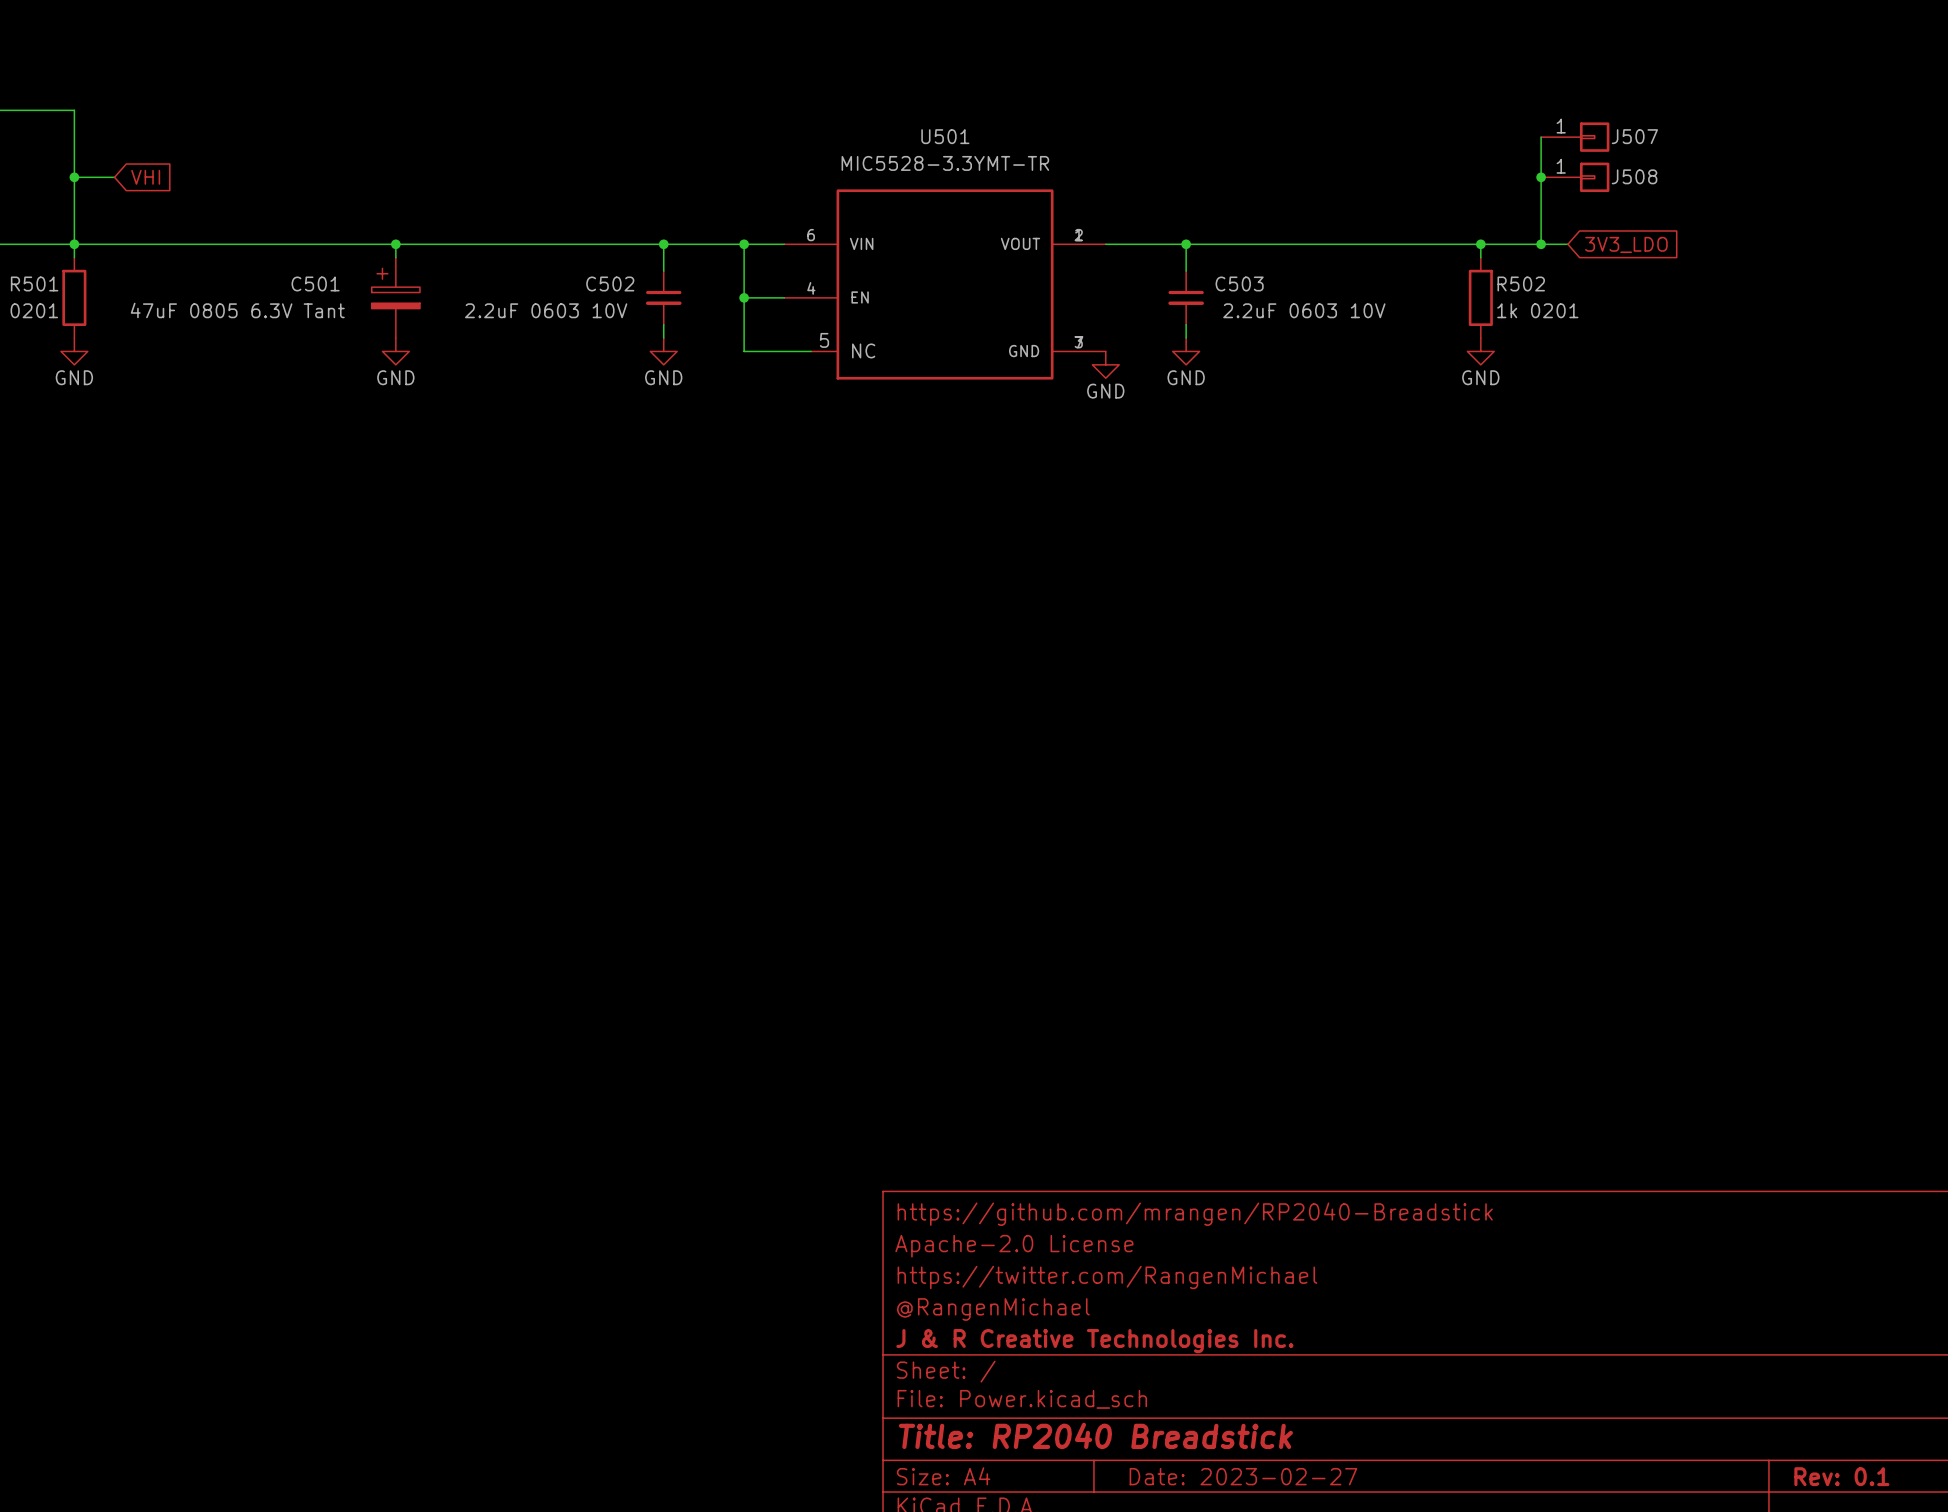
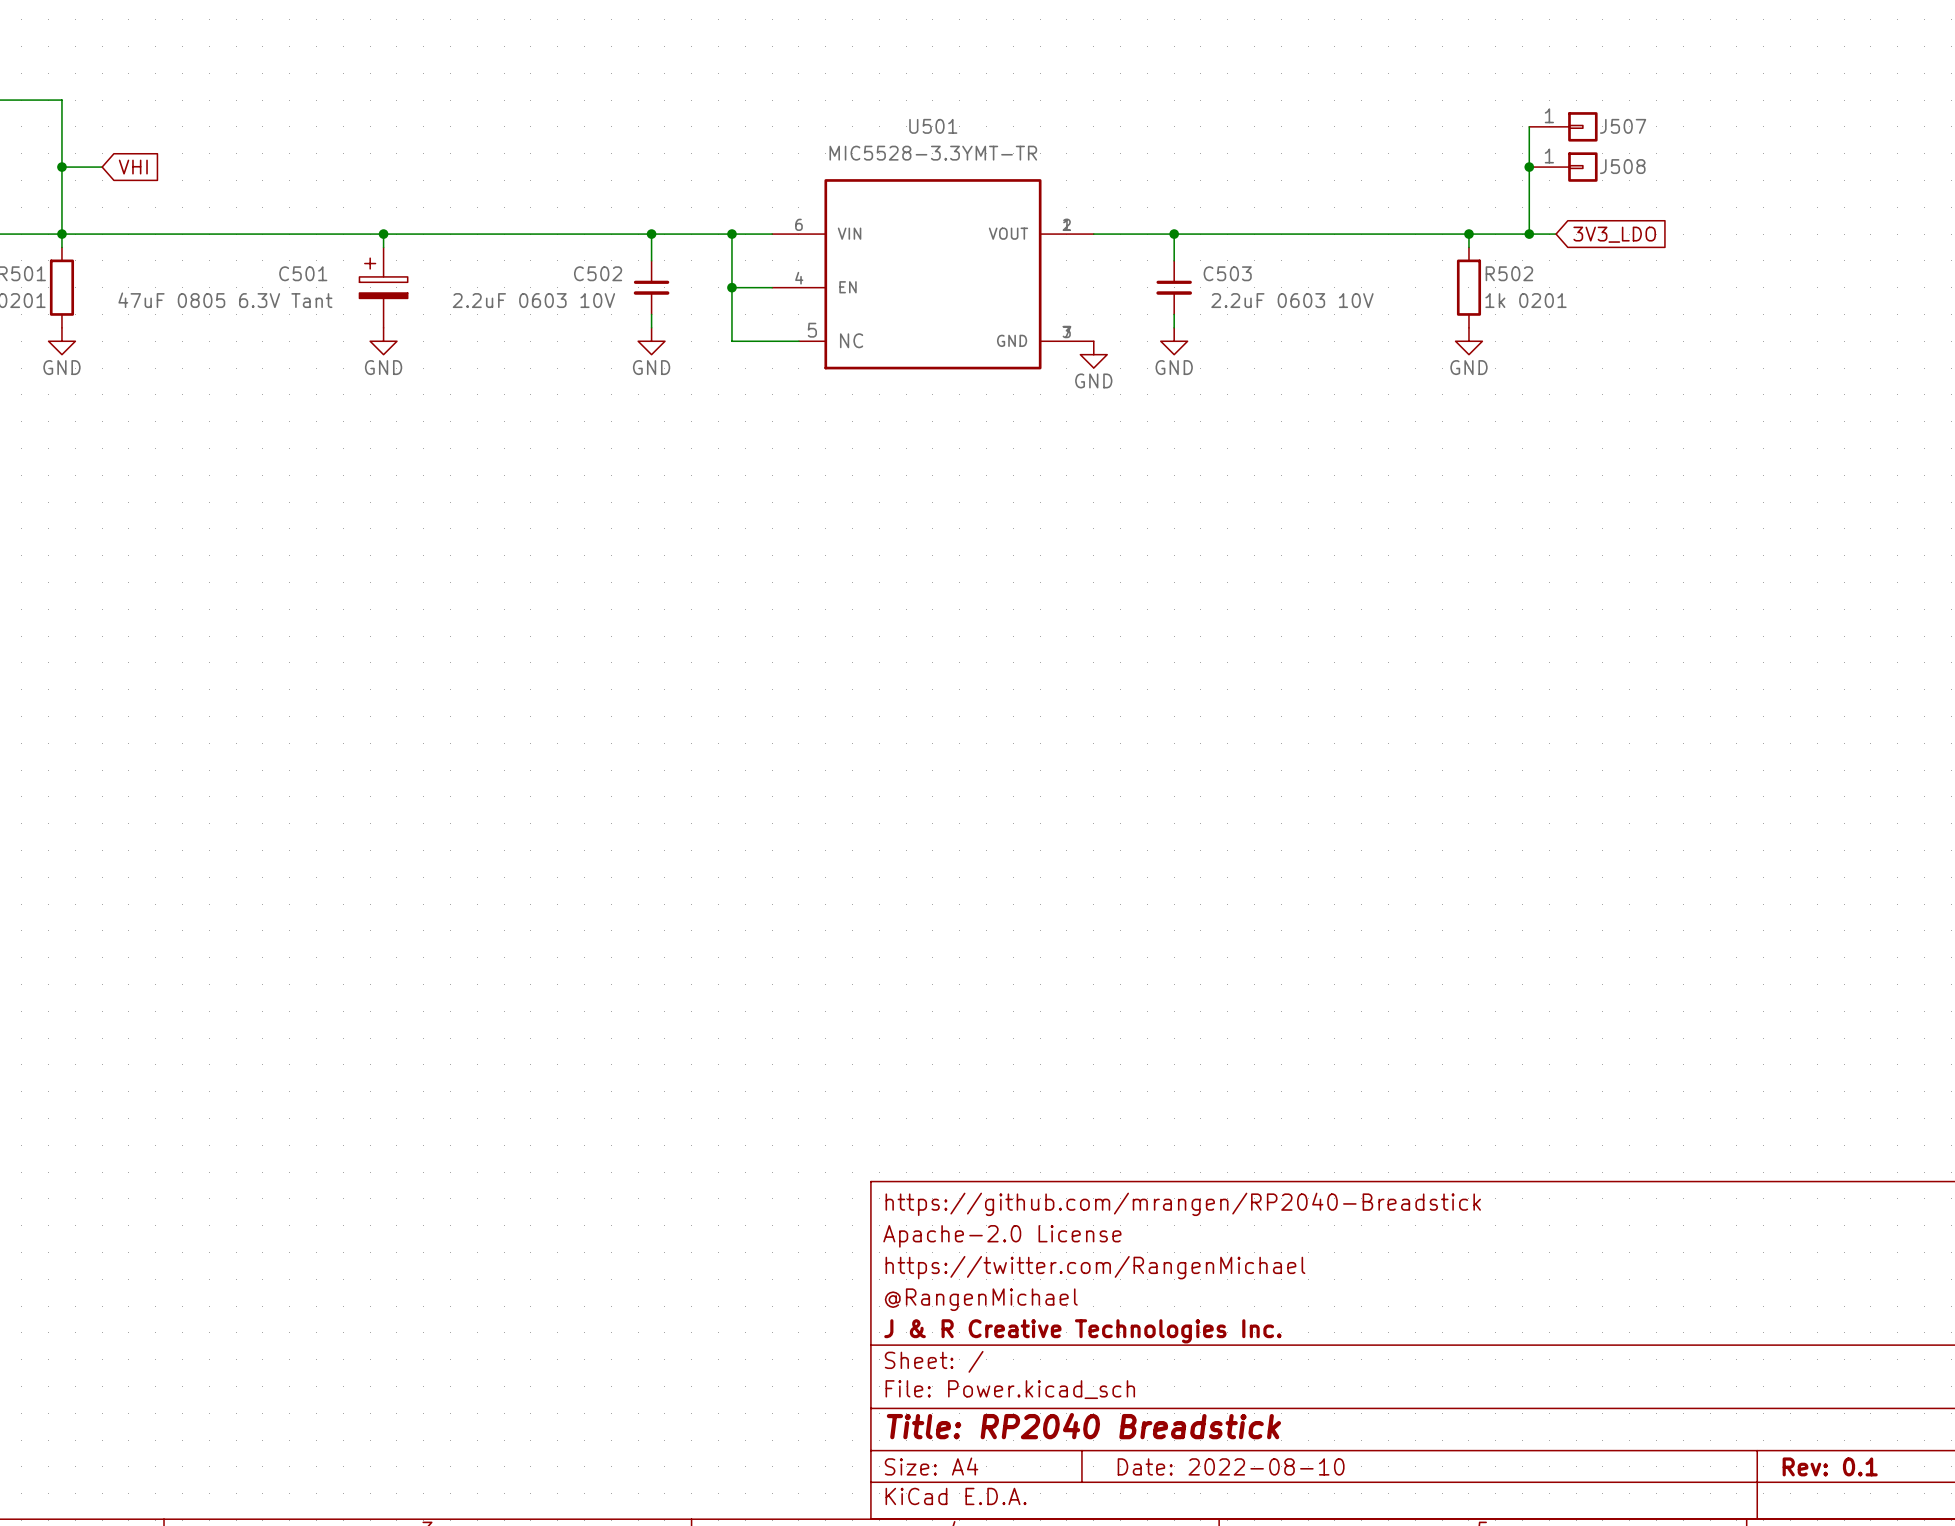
title block: Date: 2023-02-27 (1243, 1476) -> Date: 2022-08-10 (1231, 1466)

